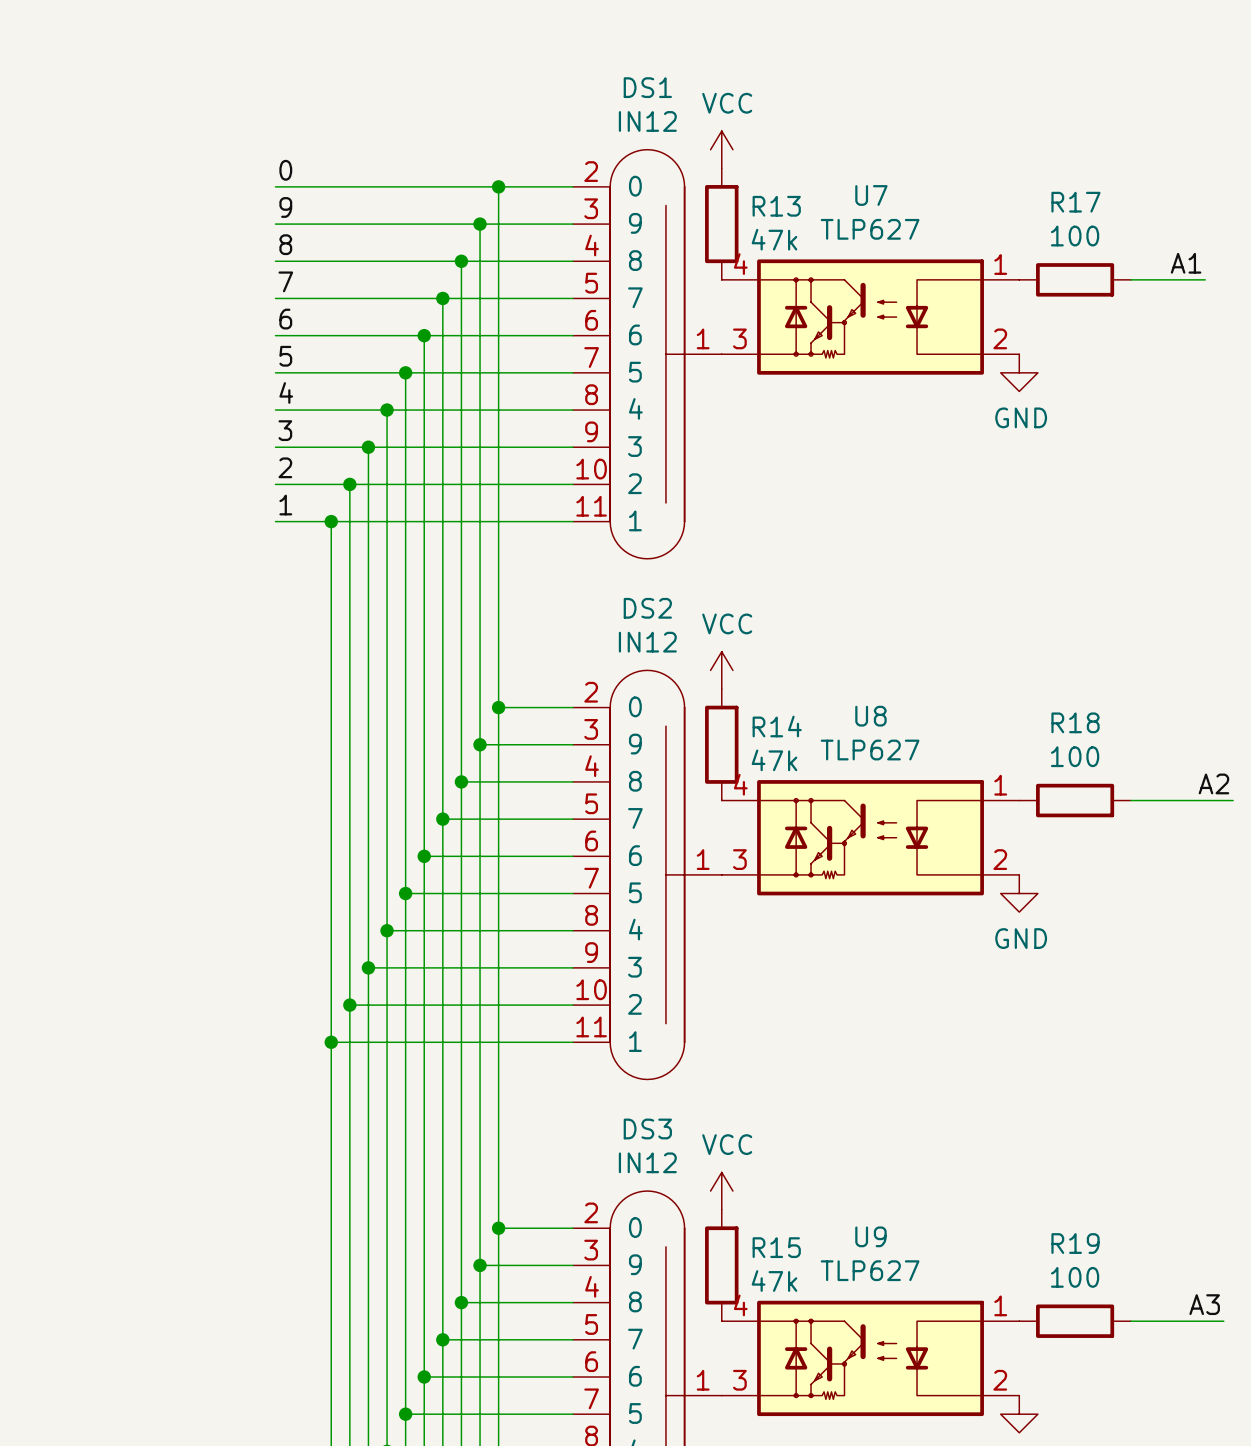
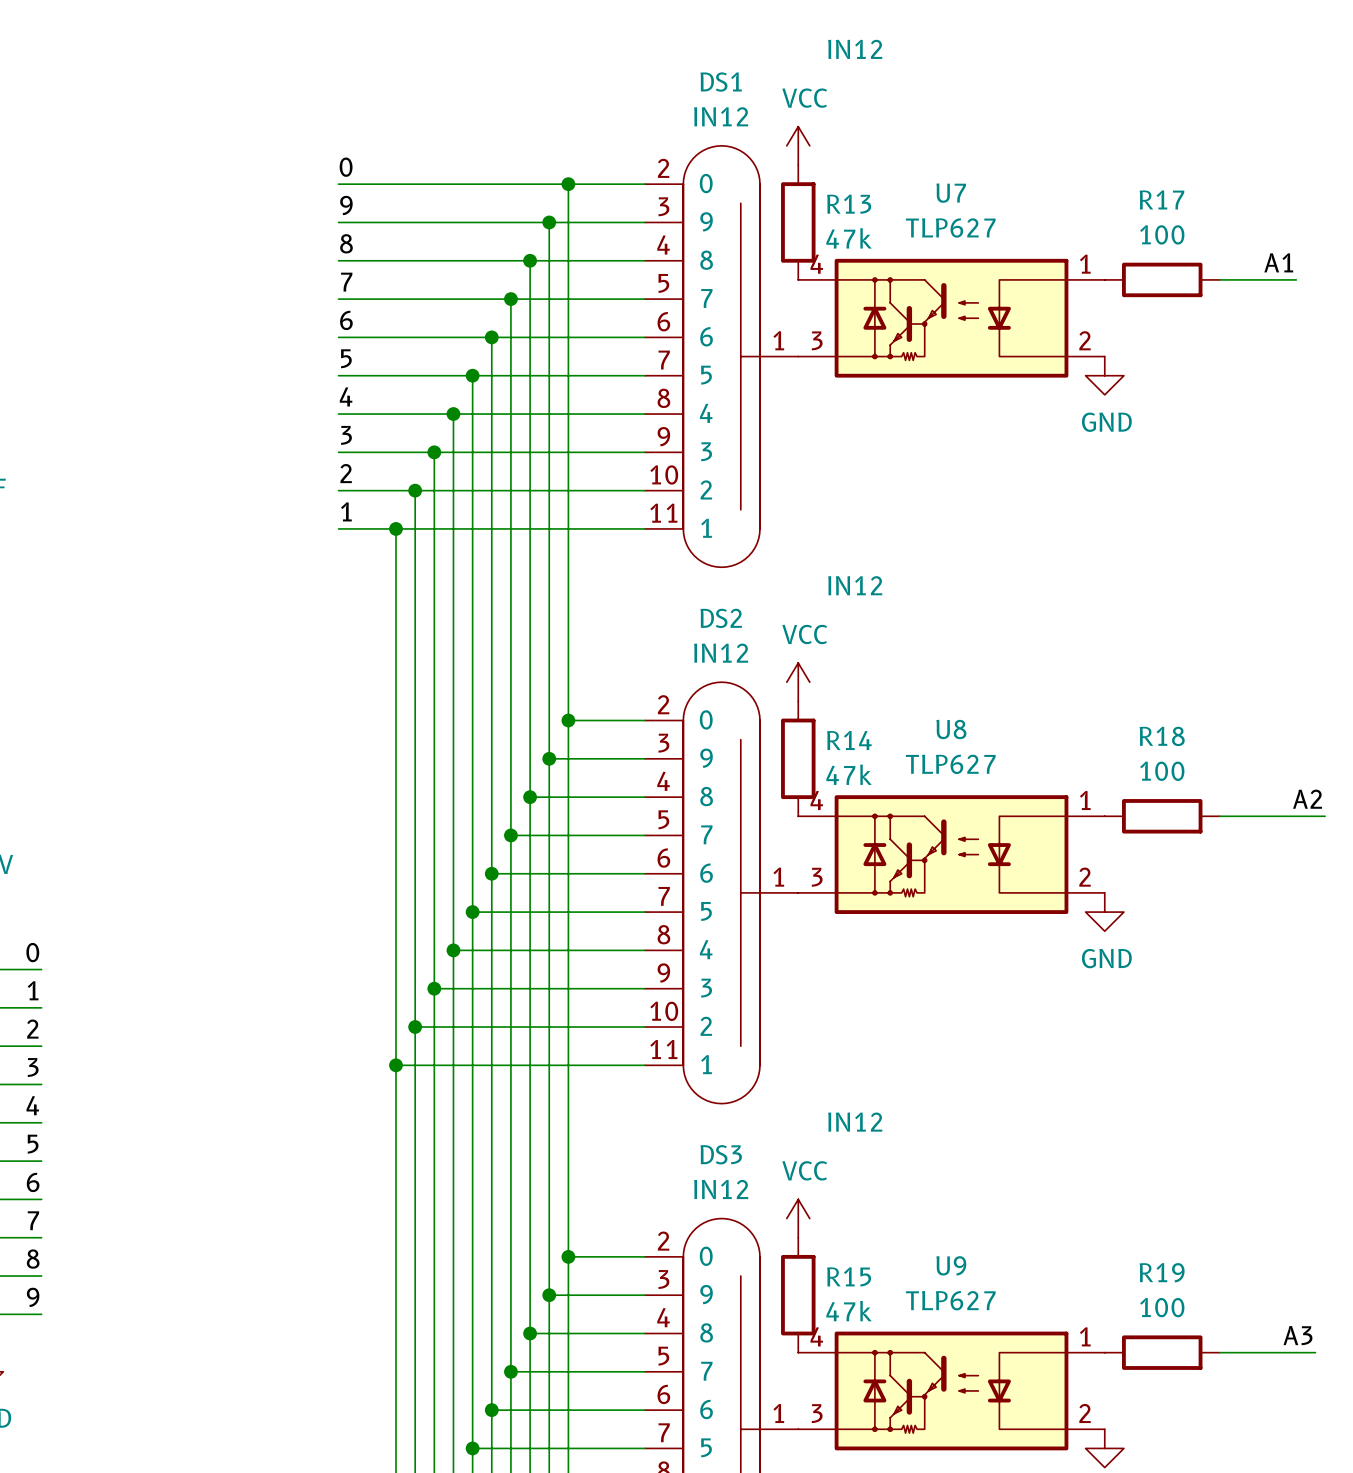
DS1 text: none -> IN12 (855, 49)
DS2 text: none -> IN12 (855, 585)
DS3 text: none -> IN12 (855, 1122)

